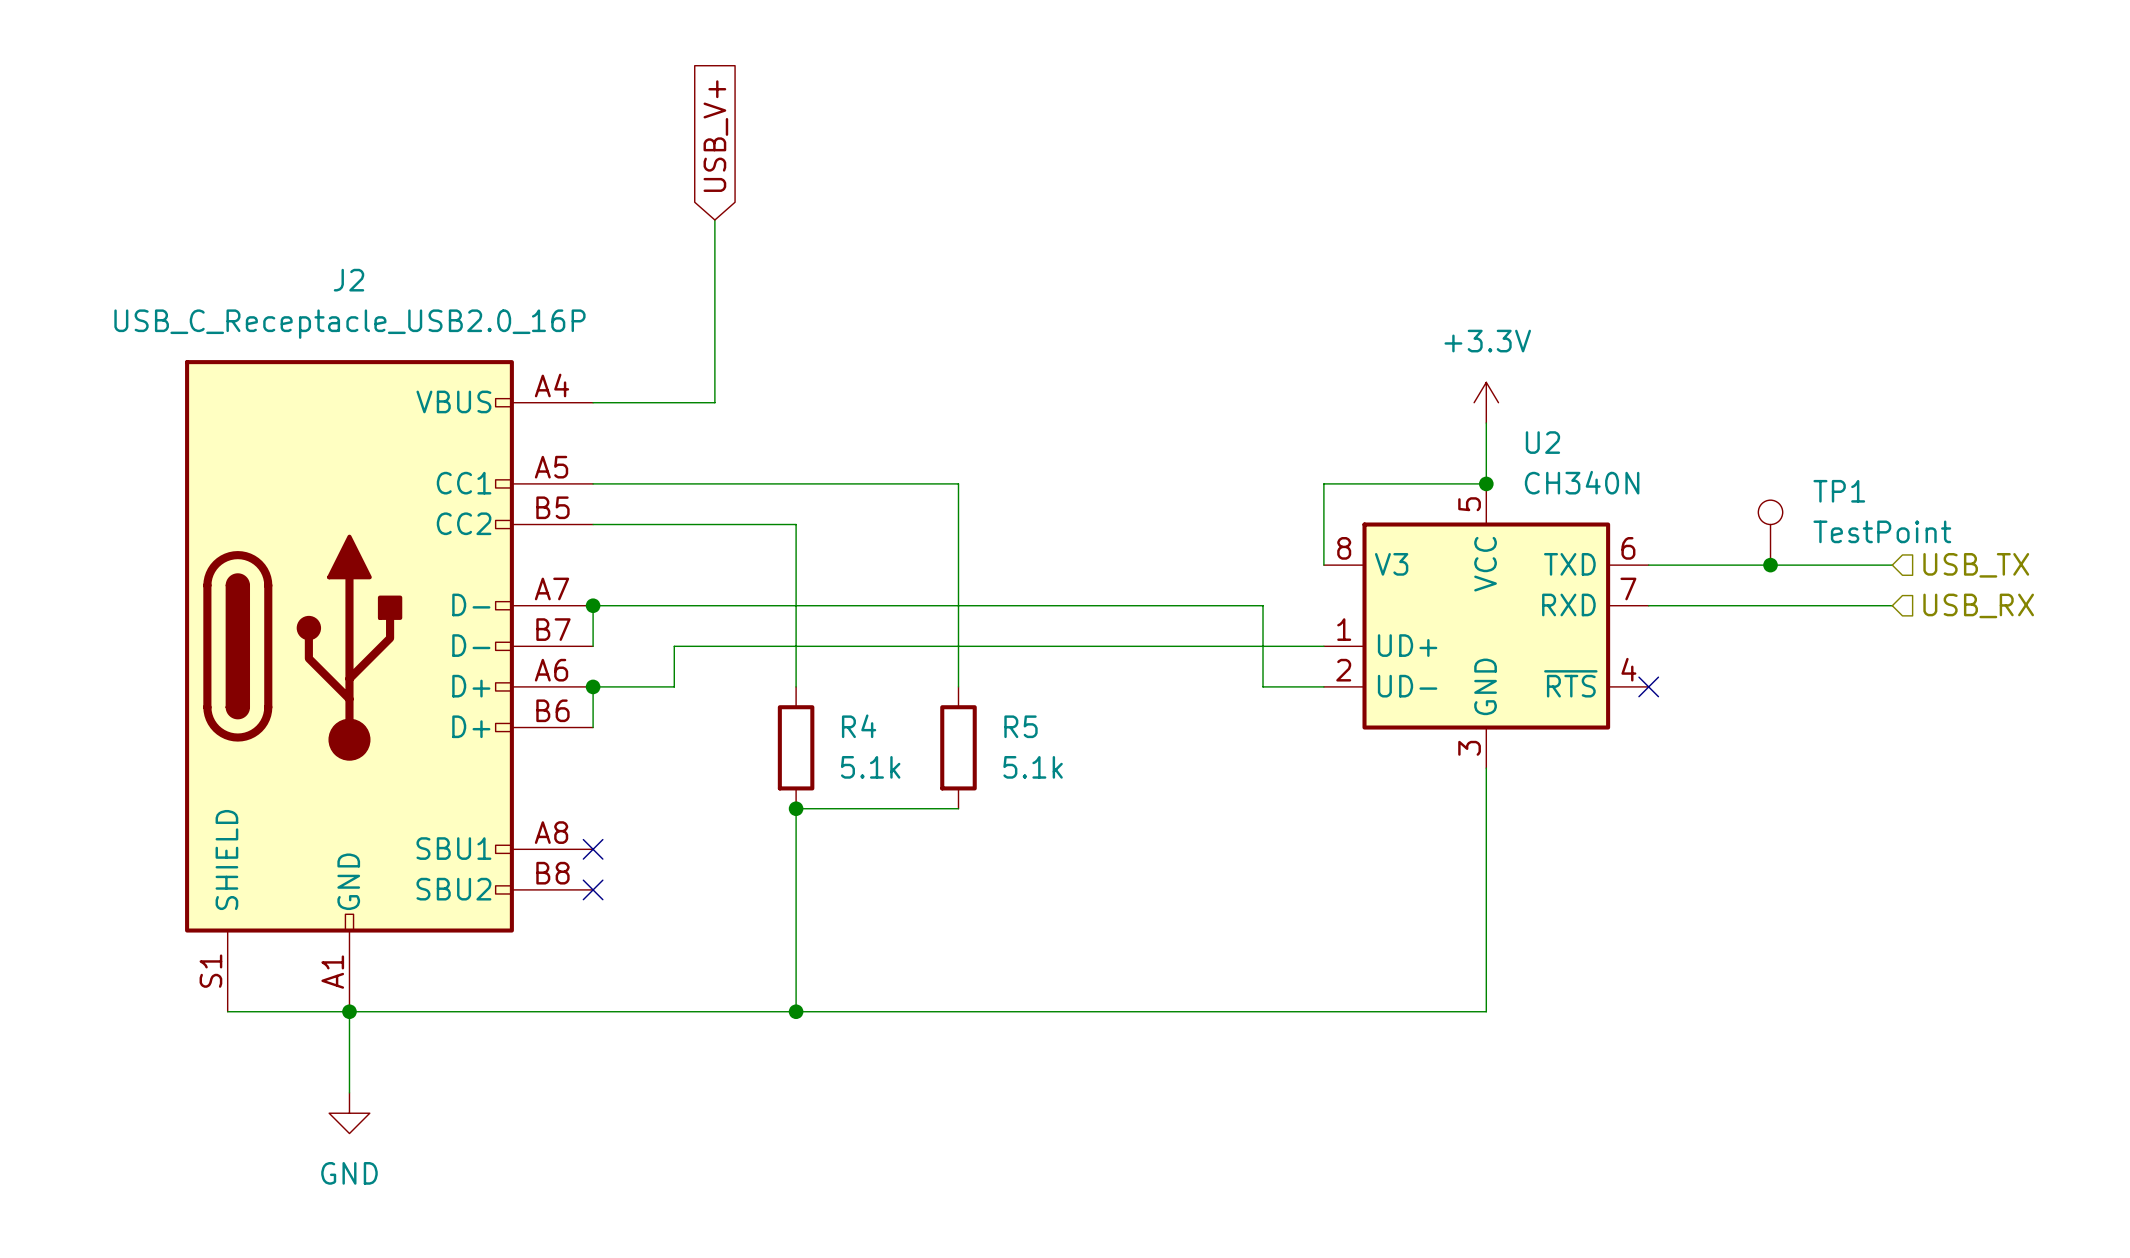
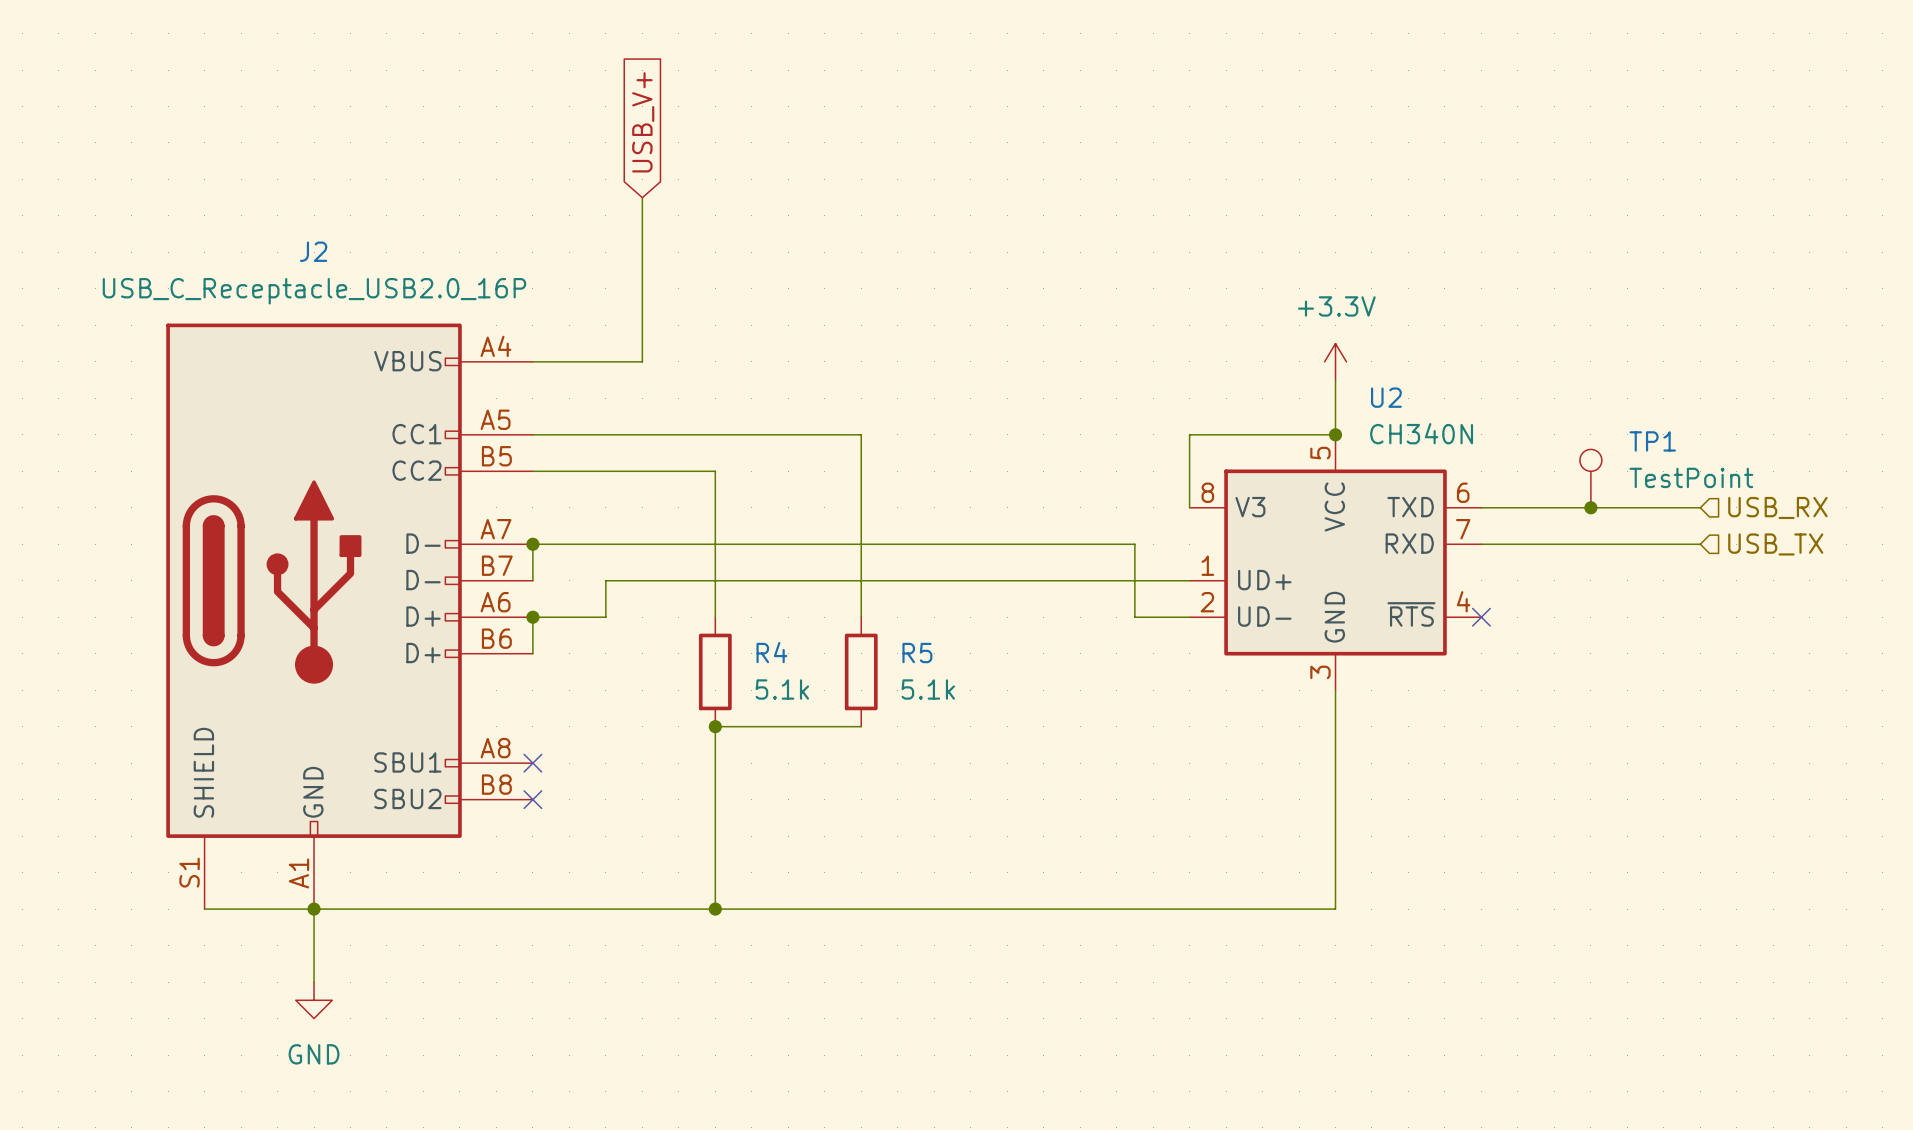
hierarchical label: USB_TX (1976, 565) -> USB_RX (1777, 507)
hierarchical label: USB_RX (1978, 605) -> USB_TX (1775, 544)

